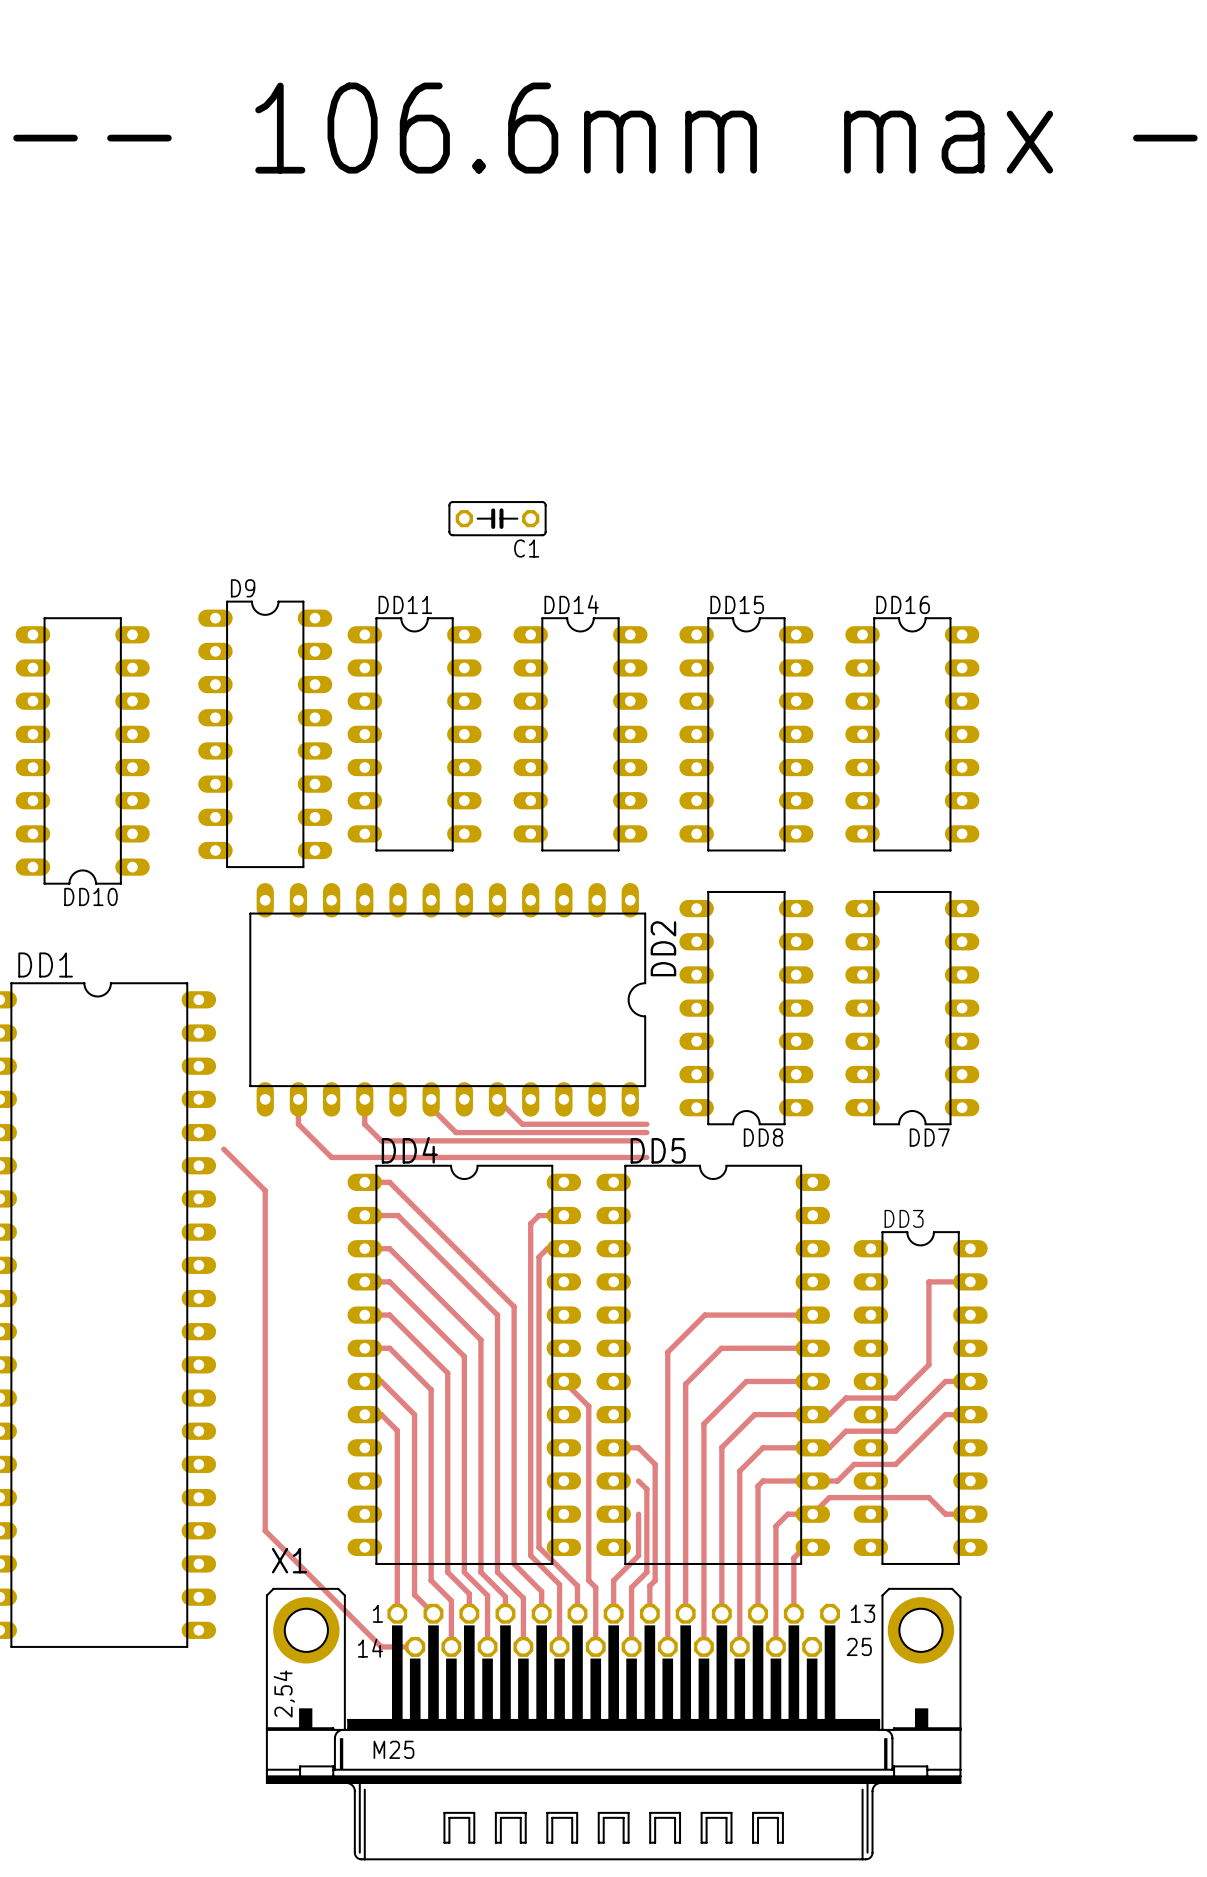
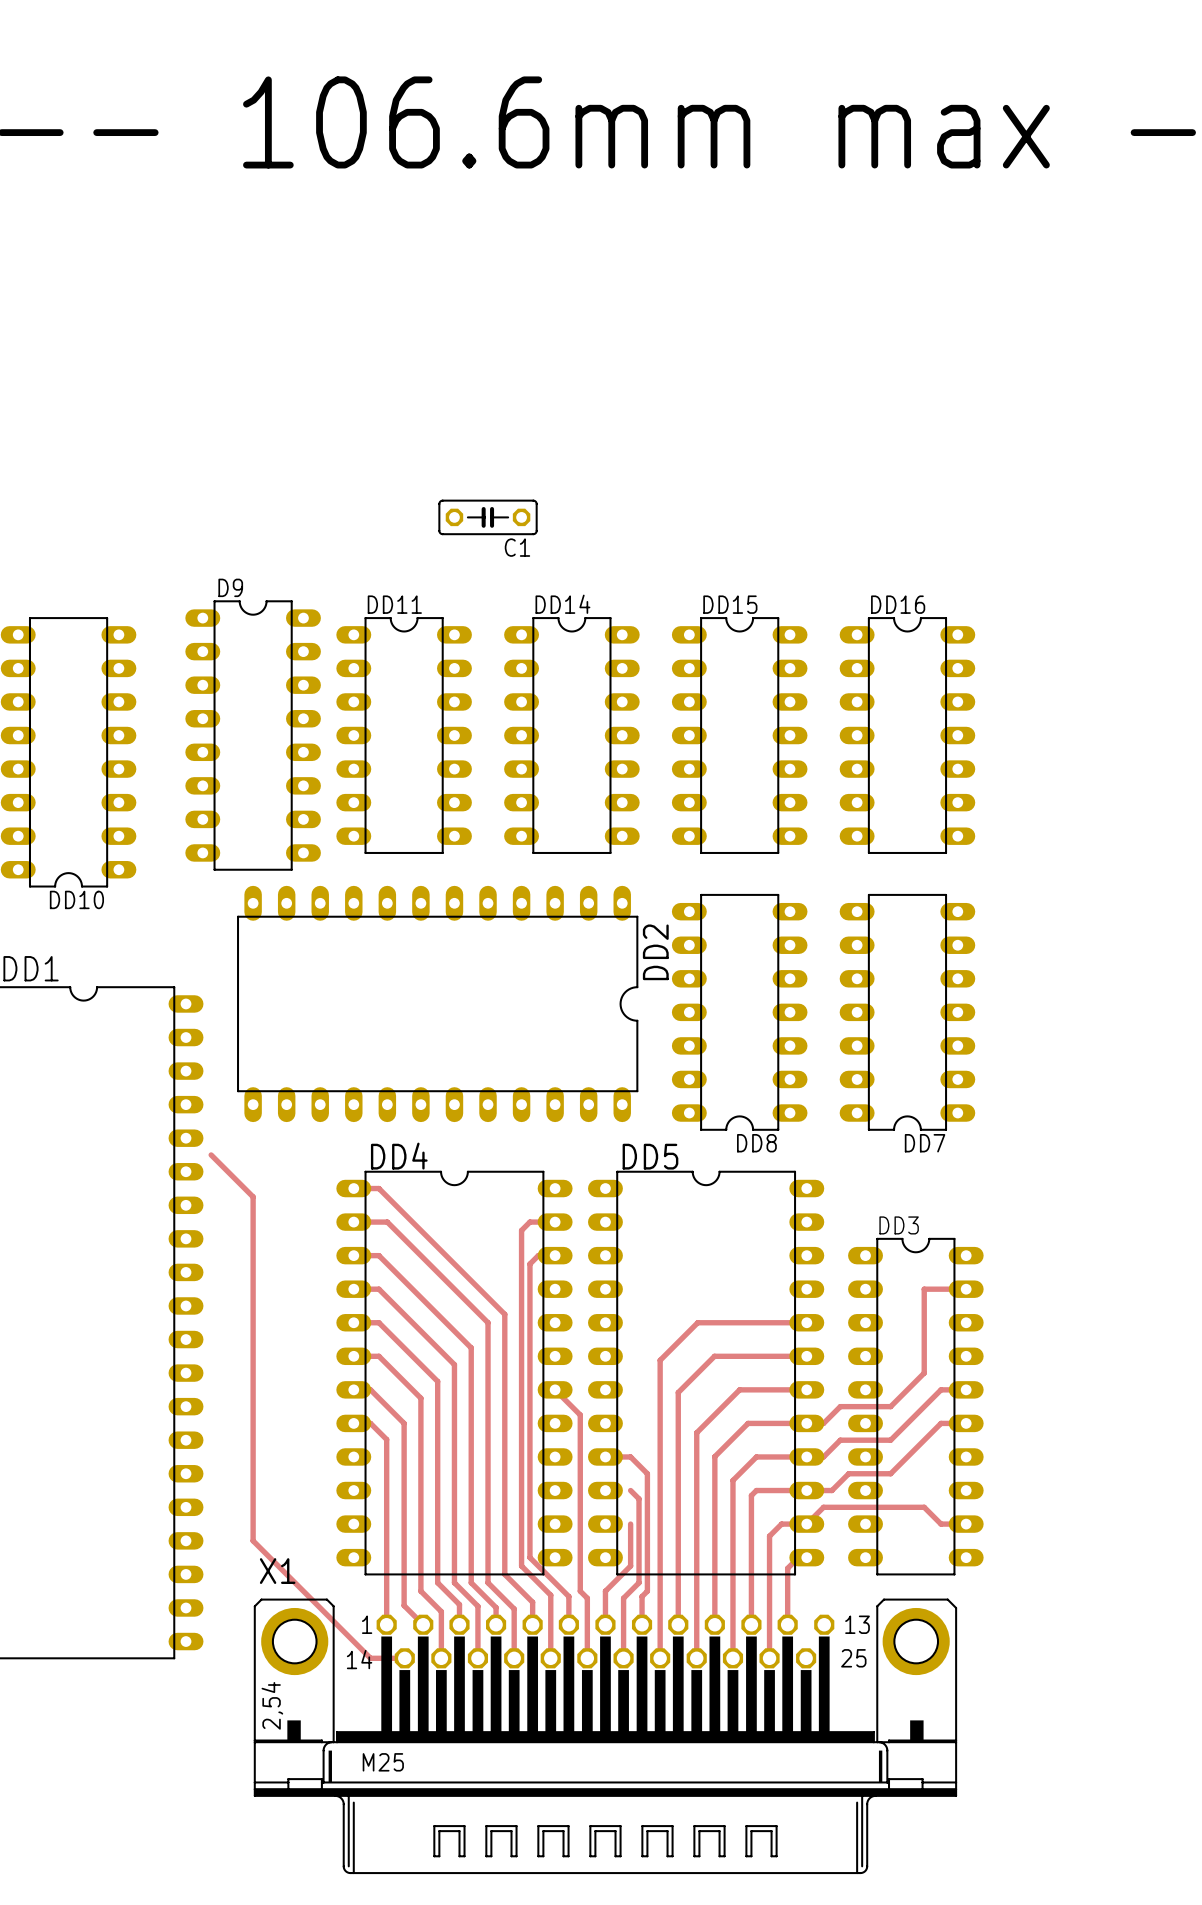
track: (298, 1099) (298, 1124) (331, 1157) (646, 1157) -> none
track: (364, 1099) (364, 1124) (381, 1140) (638, 1140) -> none
track: (431, 1099) (431, 1107) (456, 1132) (646, 1132) -> none
track: (497, 1099) (522, 1124) (646, 1124) -> none

